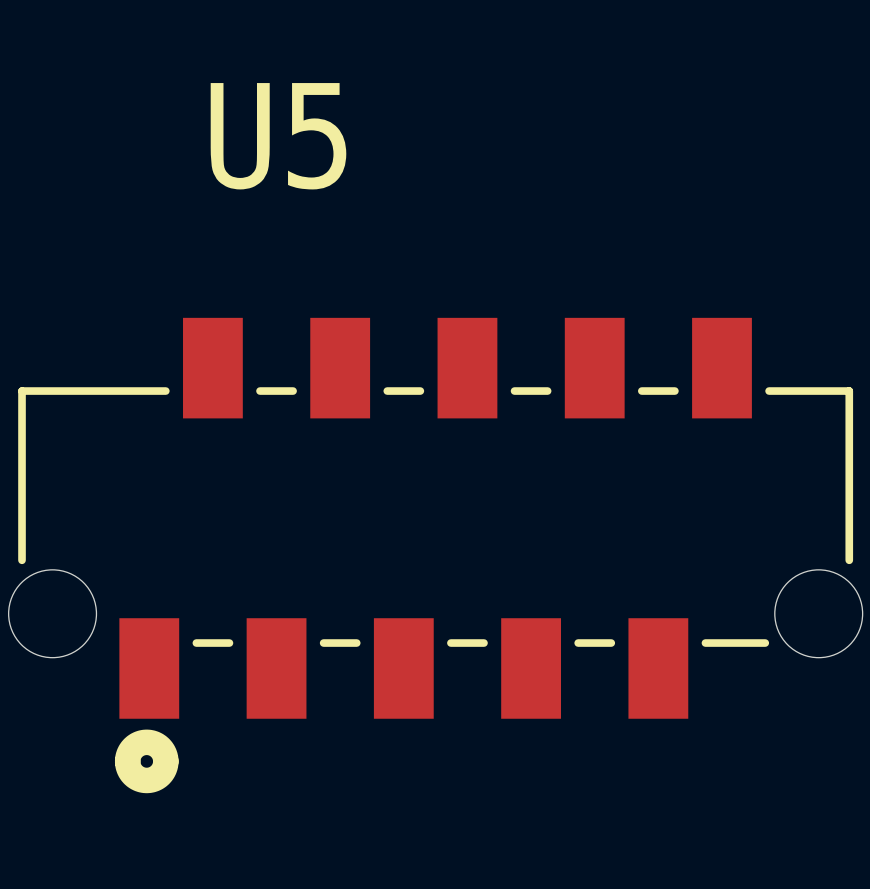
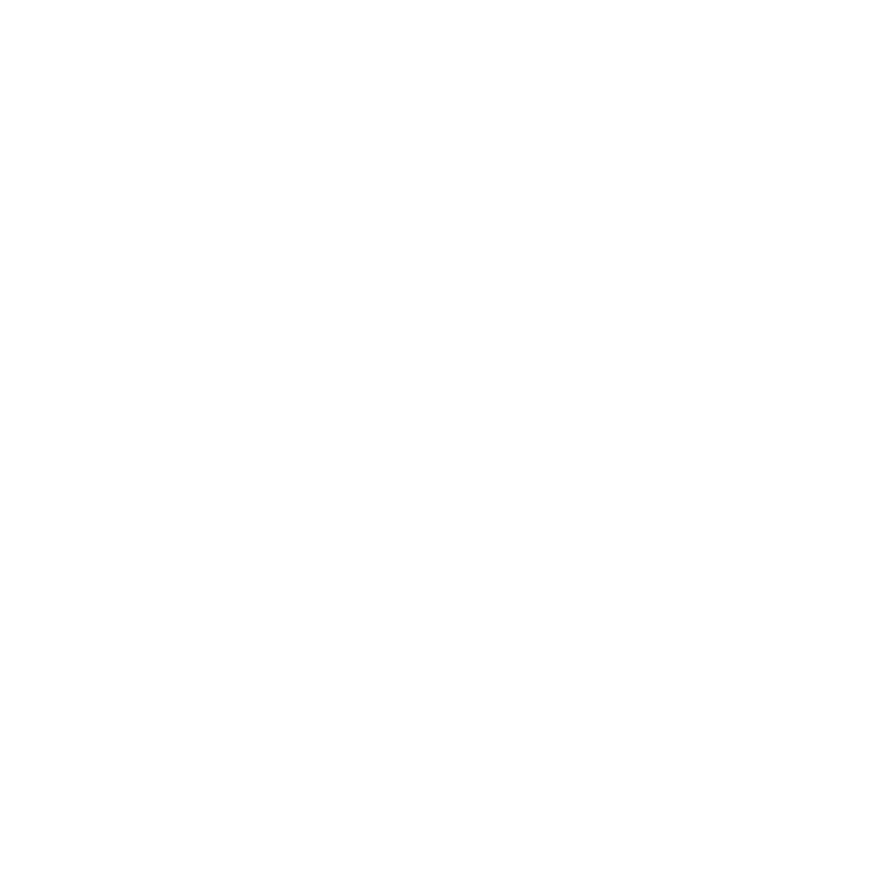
U5: (435, 555) -> none

